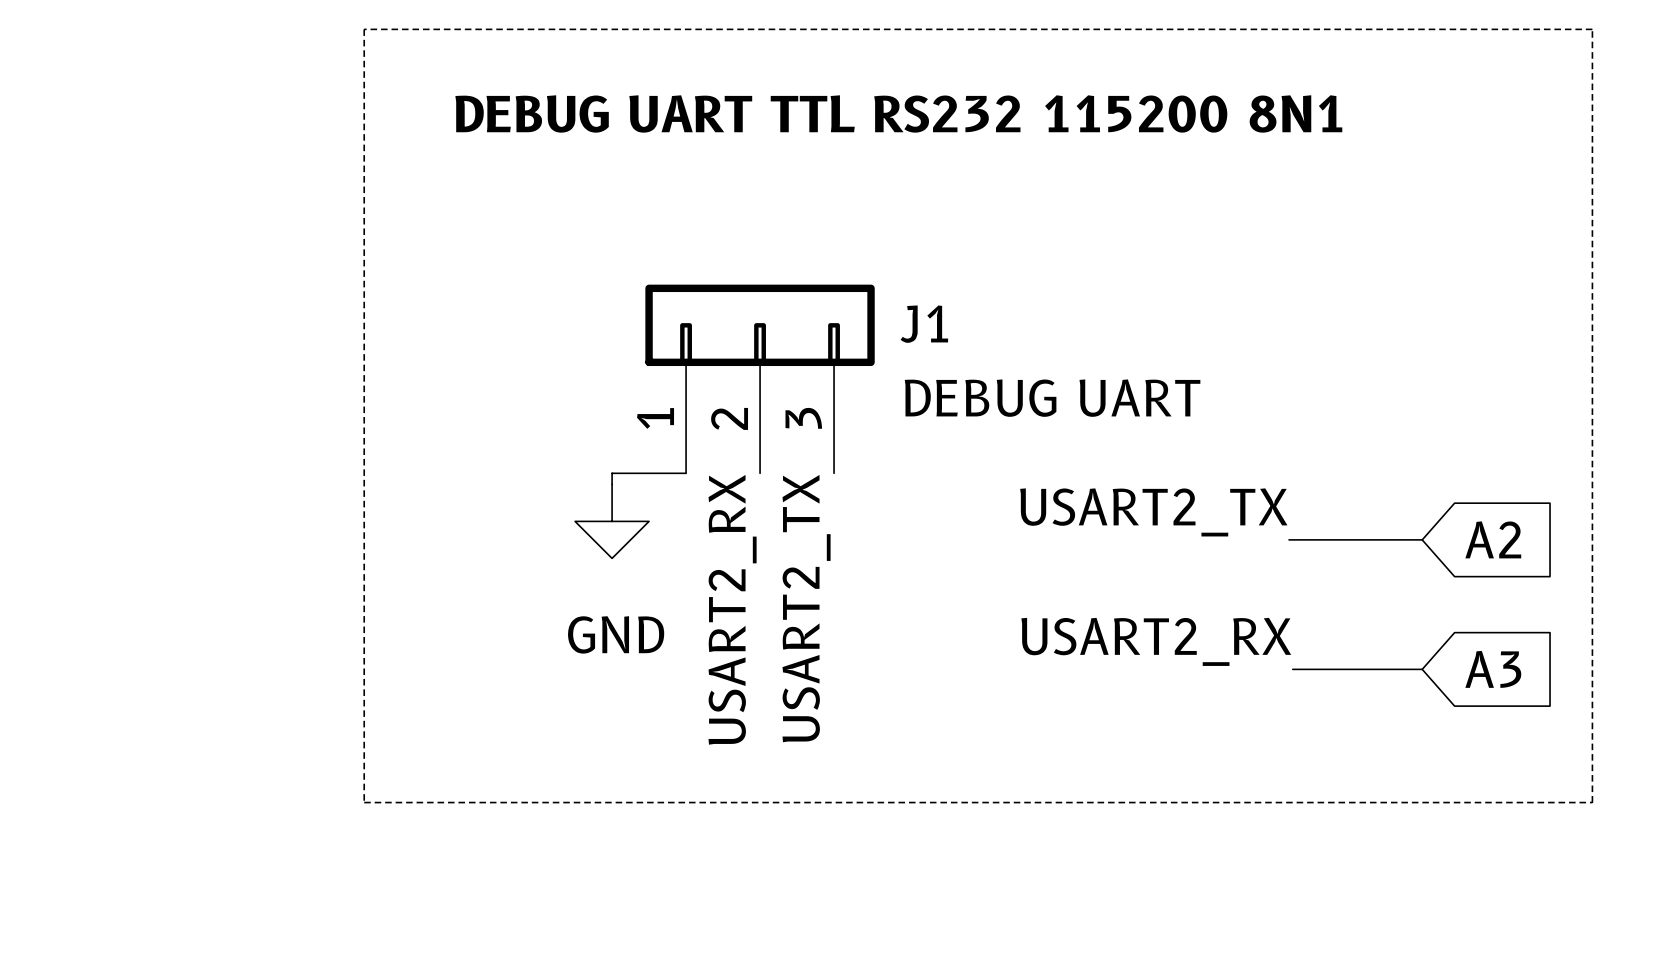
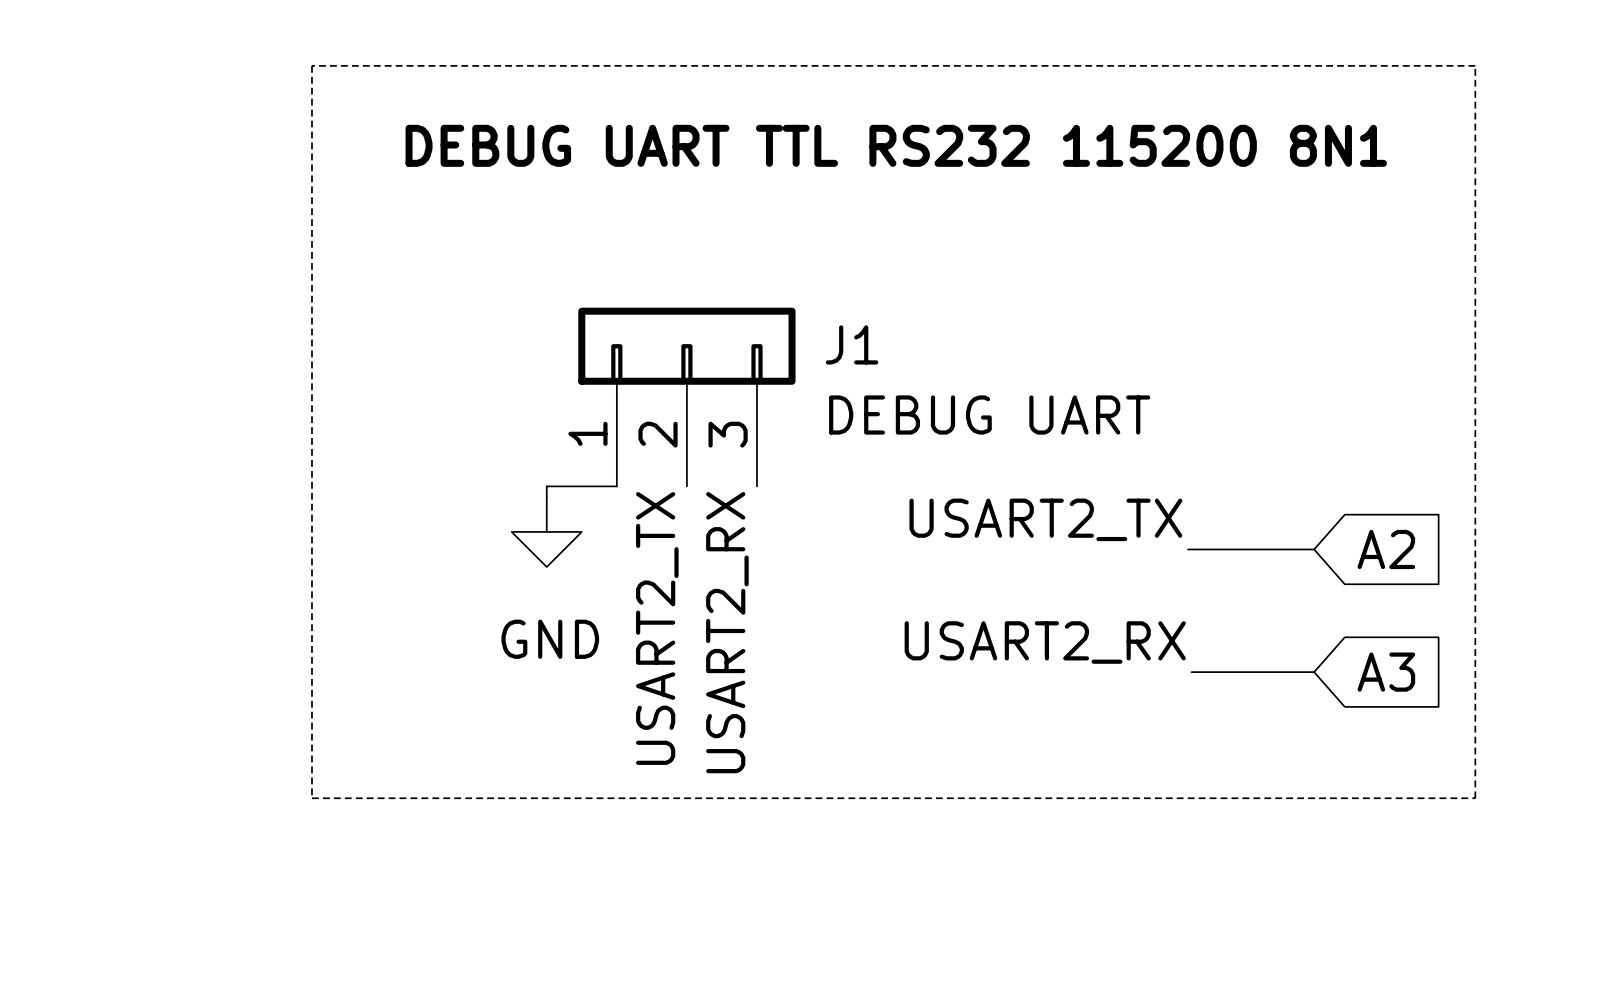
label: USART2_TX (806, 608) -> USART2_RX (727, 632)
label: USART2_RX (732, 609) -> USART2_TX (657, 628)

